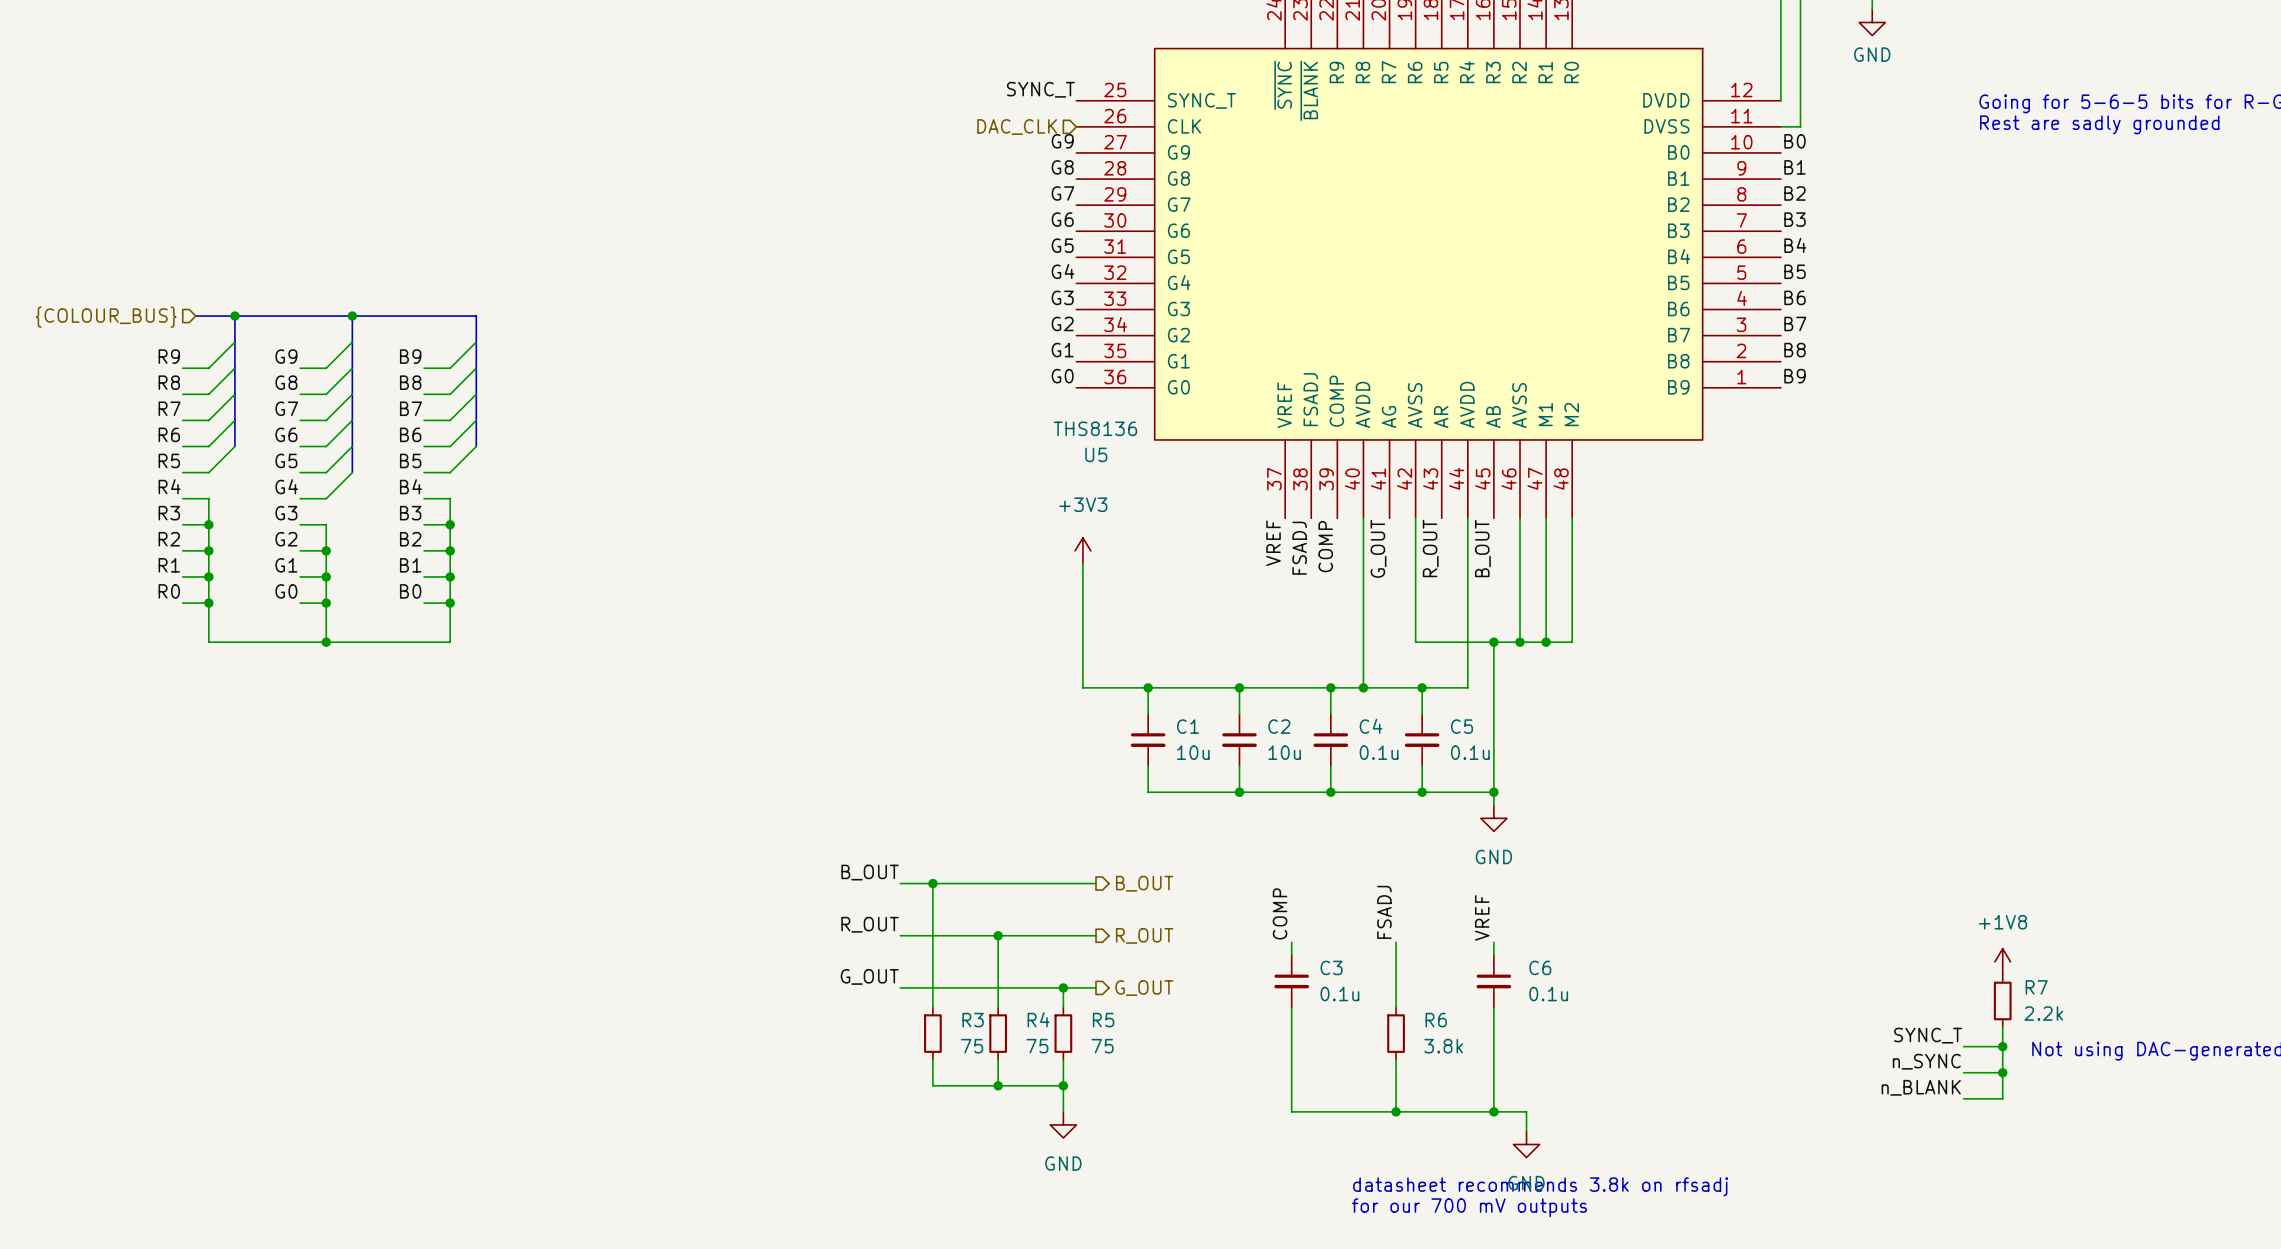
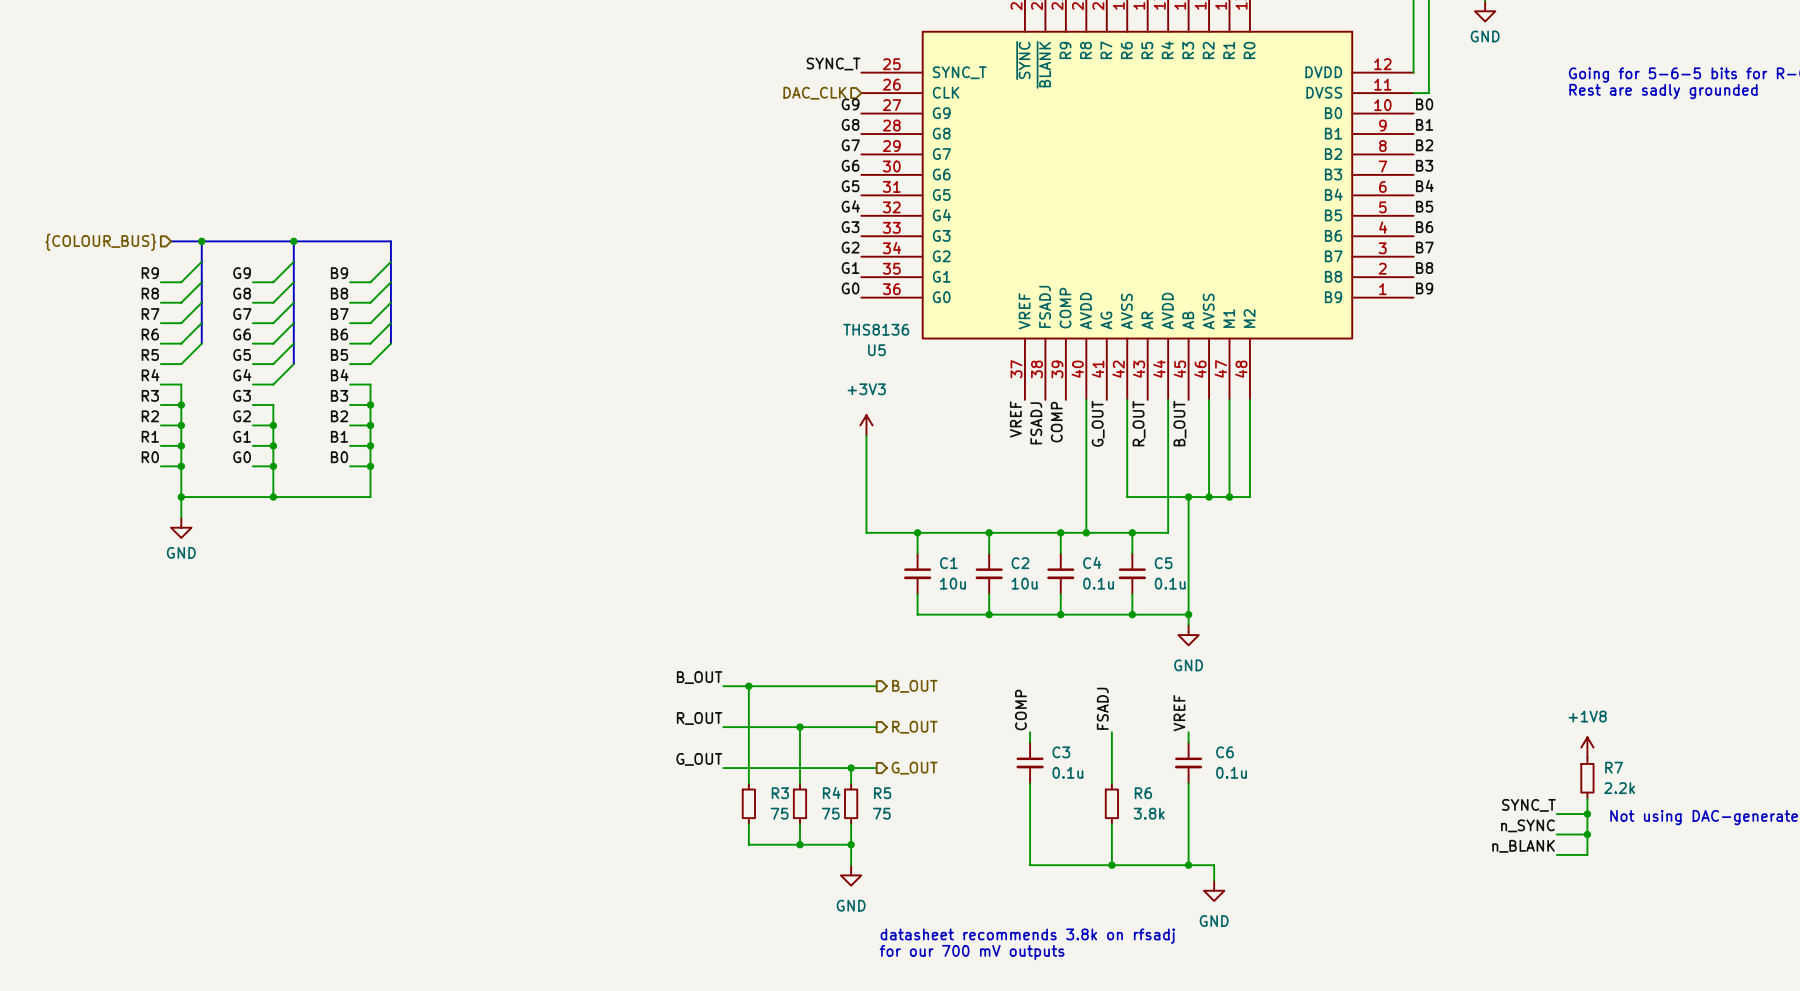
wire: none -> (181, 497) (181, 517)
junction: none -> (181, 497)
power symbol: none -> GND (181, 527)
text position: datasheet recommends 3.8k on rfsadj (1540, 1186) -> datasheet recommends 3.8k on rfsadj (1027, 936)
text position: for our 700 mV outputs (1469, 1207) -> for our 700 mV outputs (972, 952)

